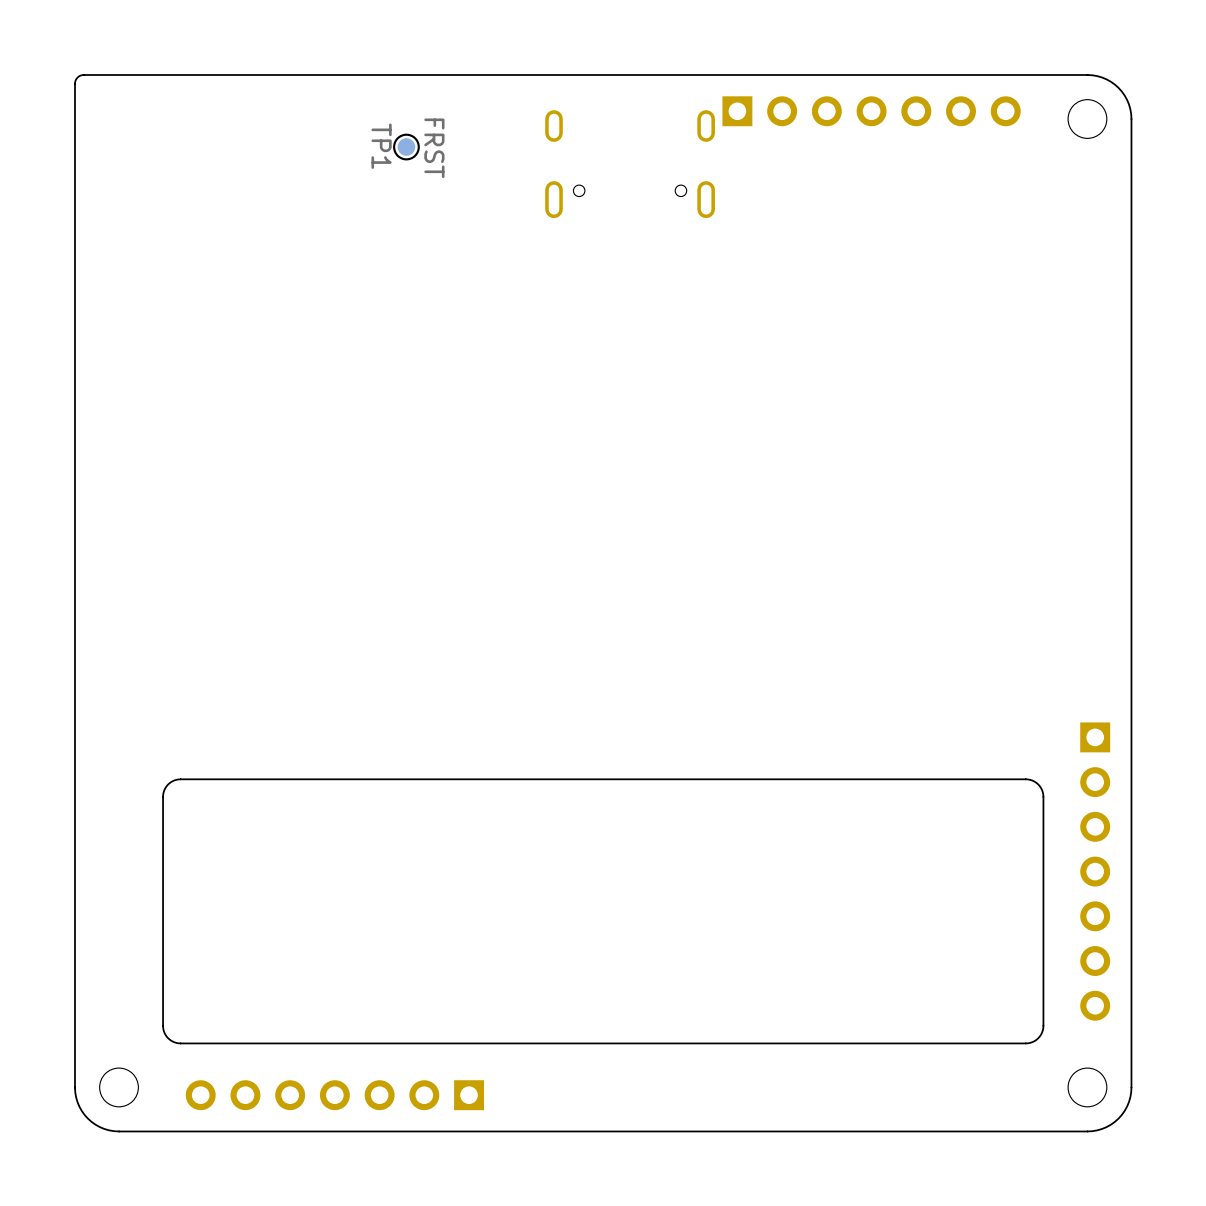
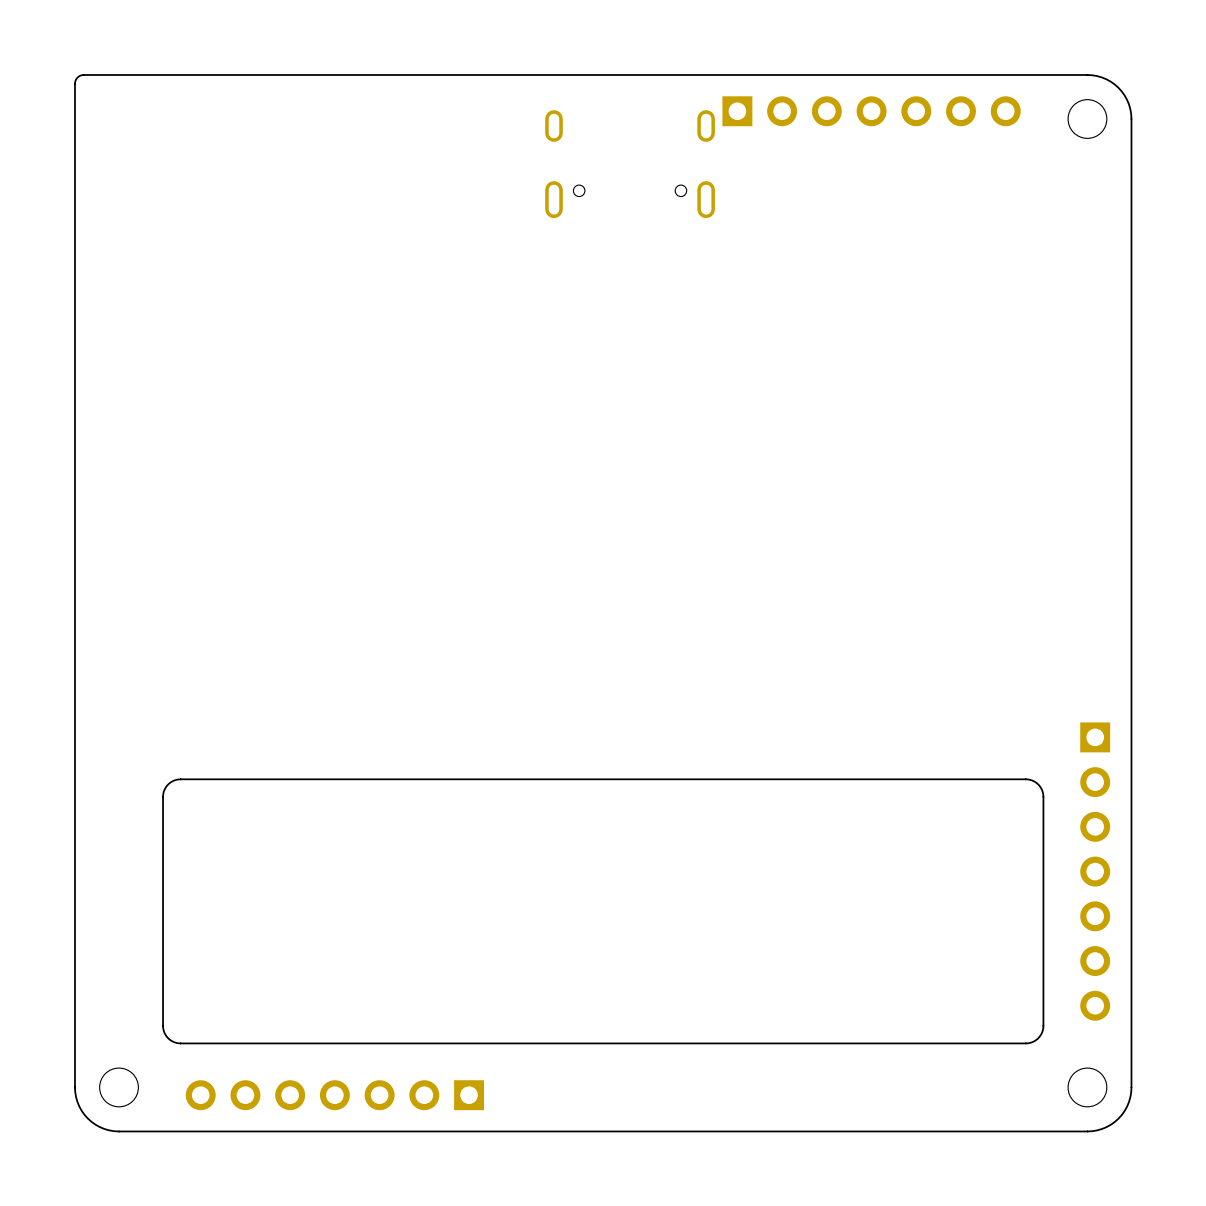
TP1: FRST (406, 147) -> none

